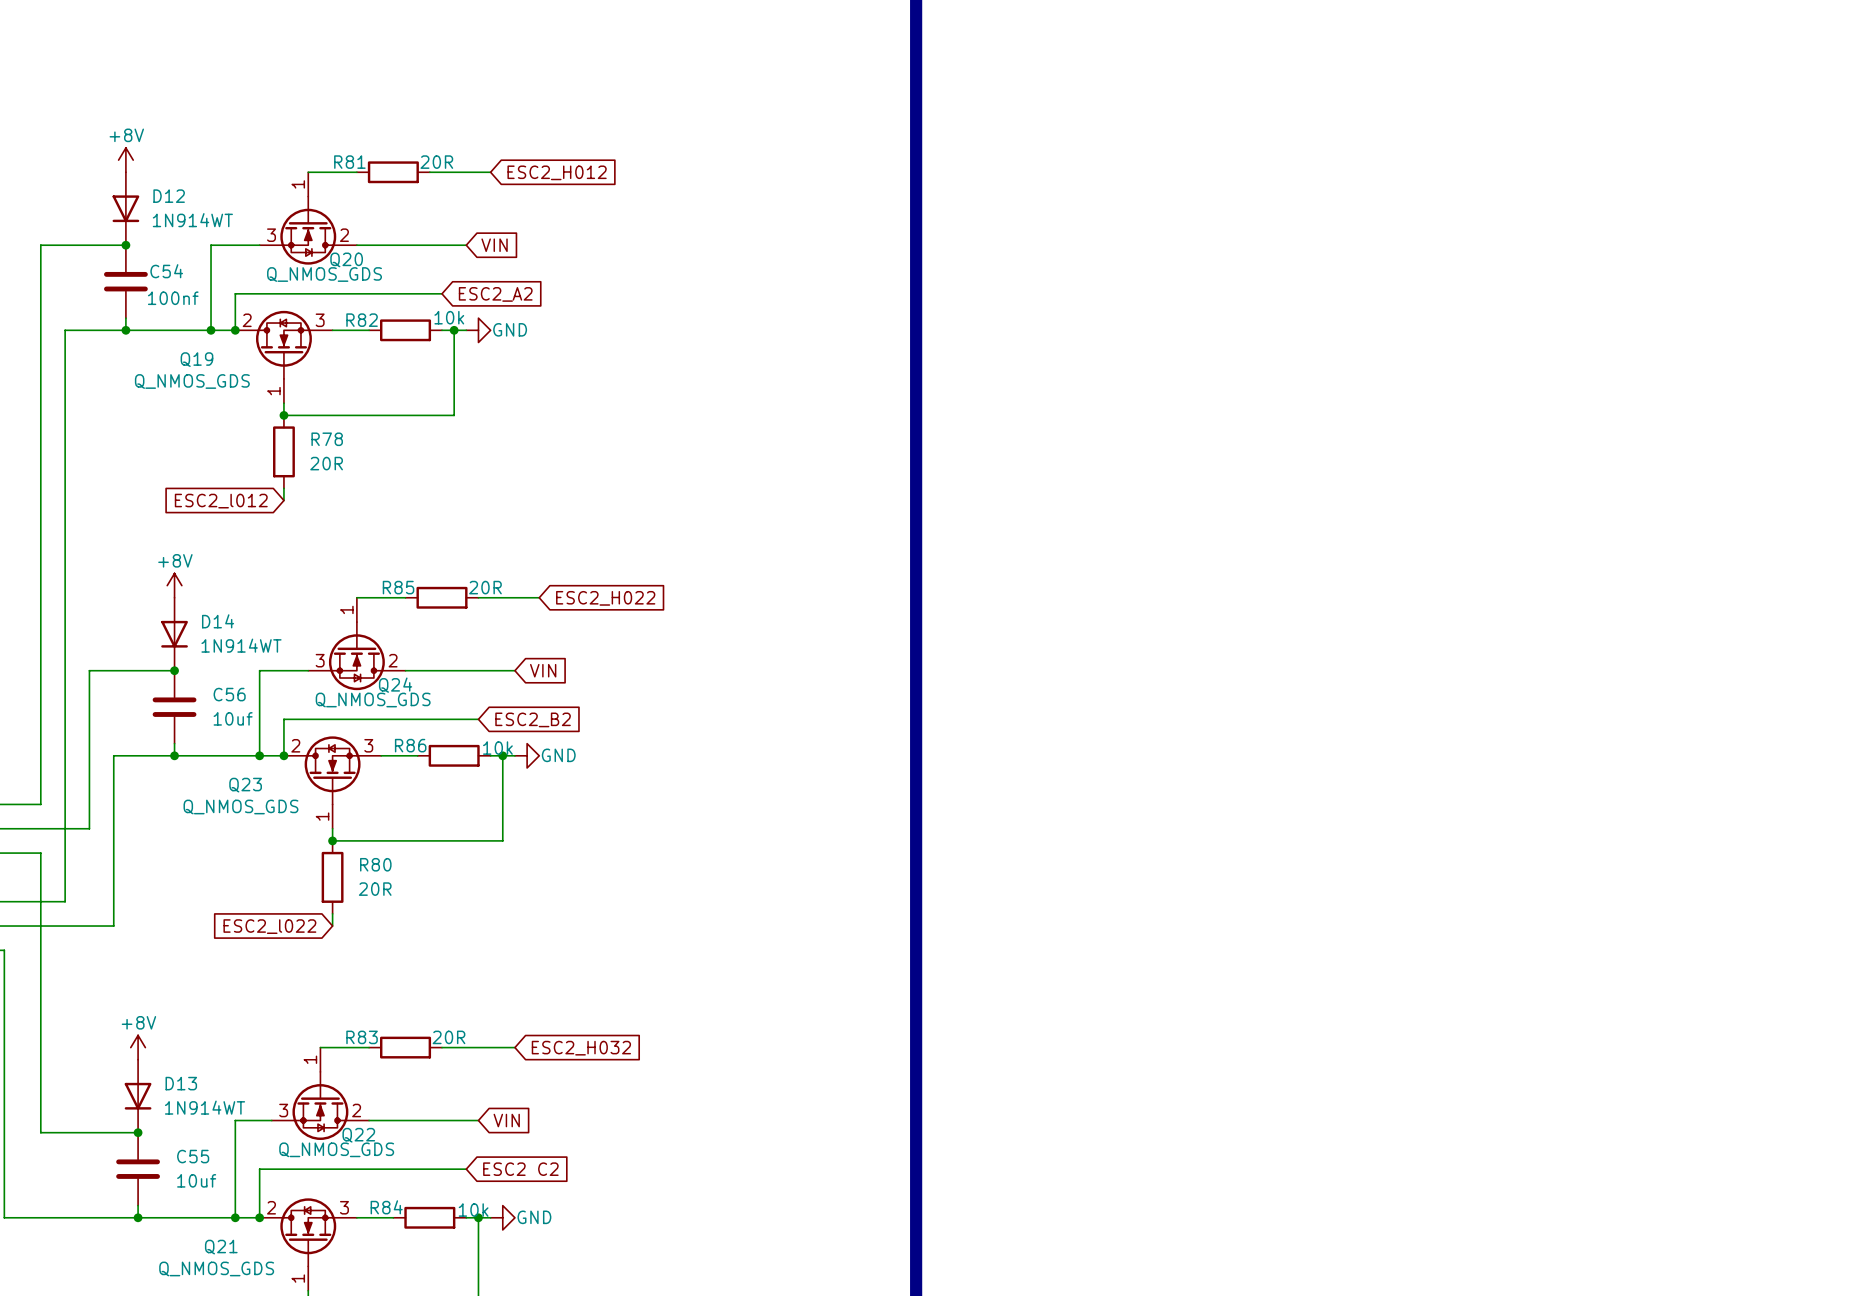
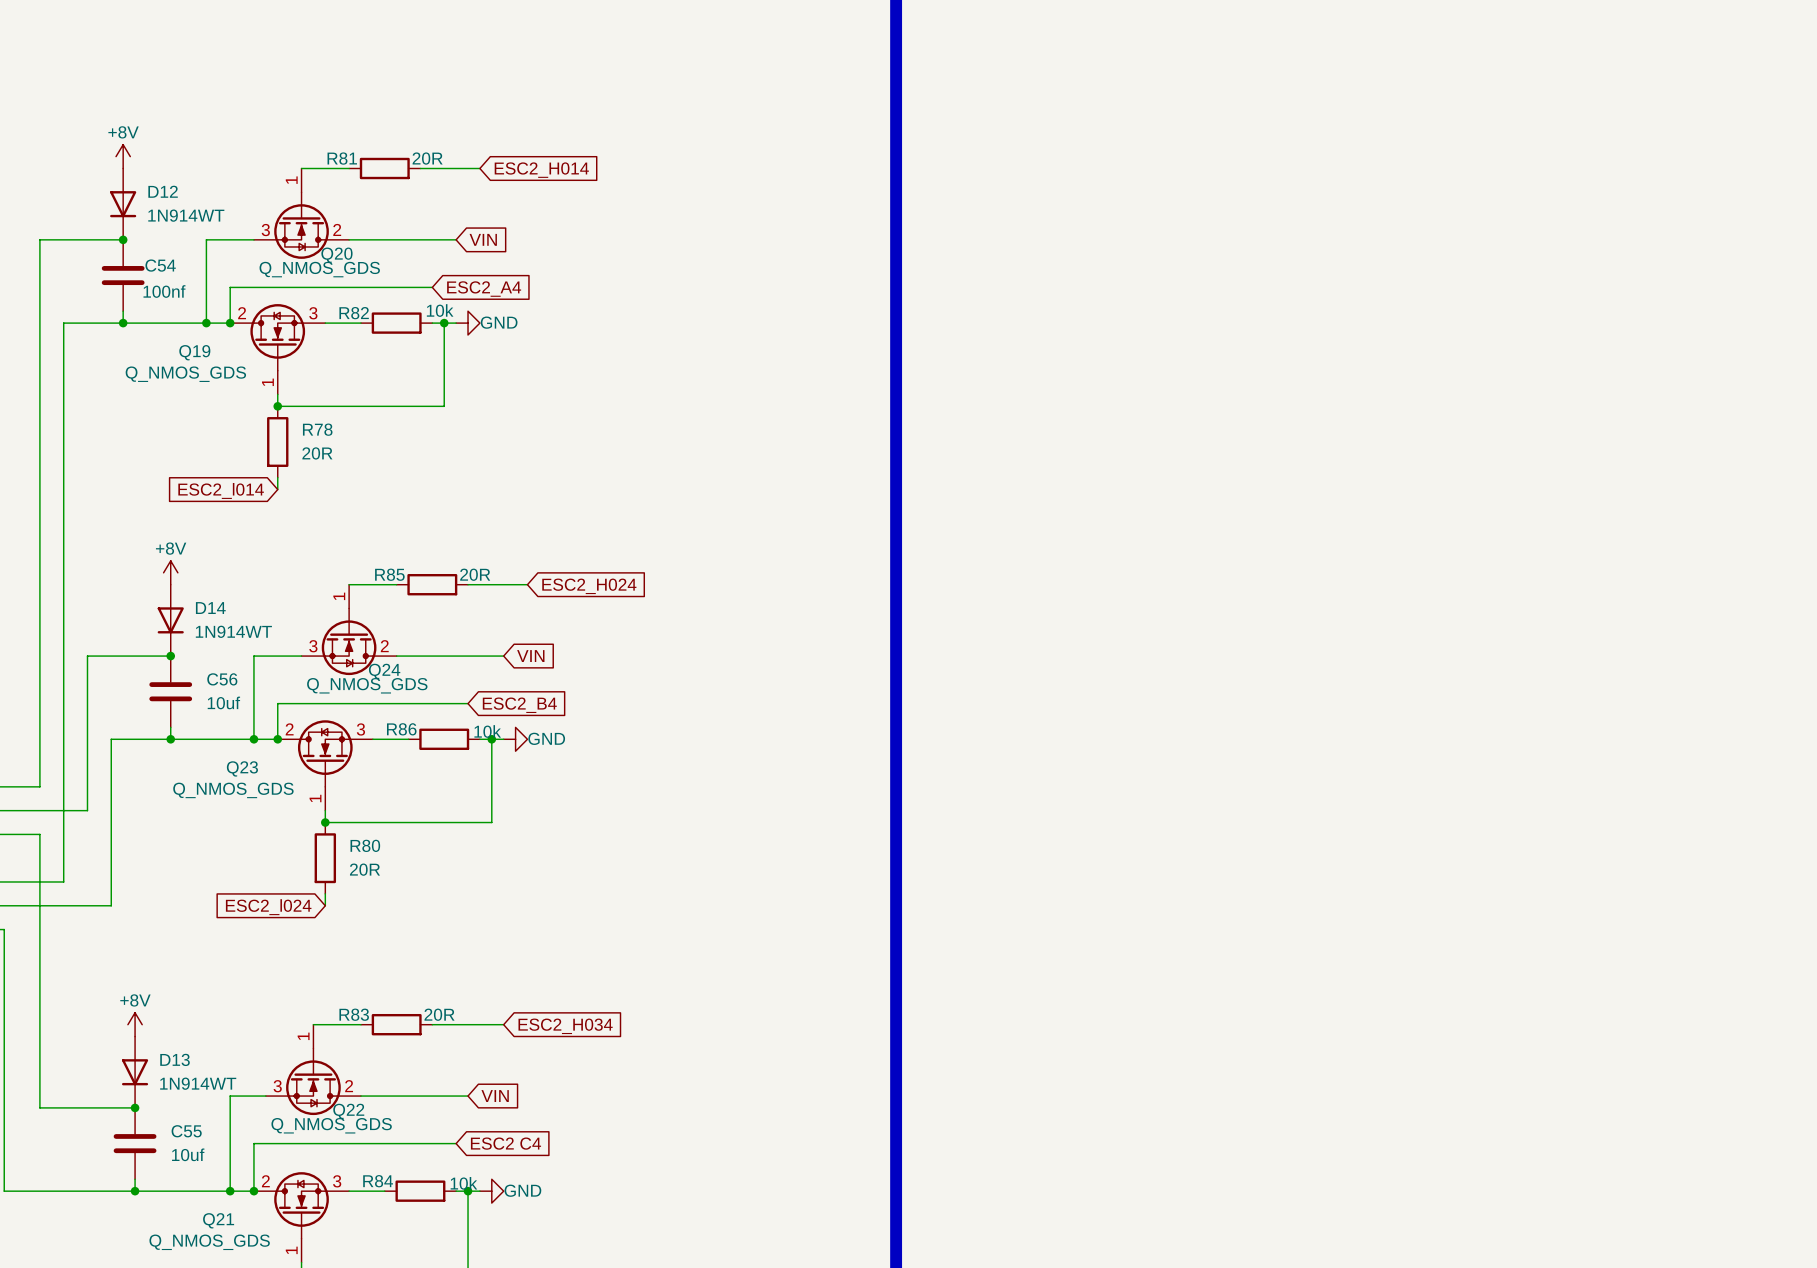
global label: ESC2_H012 (557, 172) -> ESC2_H014 (541, 170)
global label: ESC2_A2 (495, 294) -> ESC2_A4 (484, 289)
global label: ESC2_l012 (221, 501) -> ESC2_l014 (221, 490)
global label: ESC2_H022 (605, 598) -> ESC2_H024 (589, 586)
global label: ESC2_B2 (533, 719) -> ESC2_B4 (519, 705)
global label: ESC2_l022 (269, 926) -> ESC2_l024 (268, 907)
global label: ESC2_H032 (581, 1048) -> ESC2_H034 (565, 1026)
global label: ESC2 C2 (520, 1169) -> ESC2 C4 (505, 1143)

